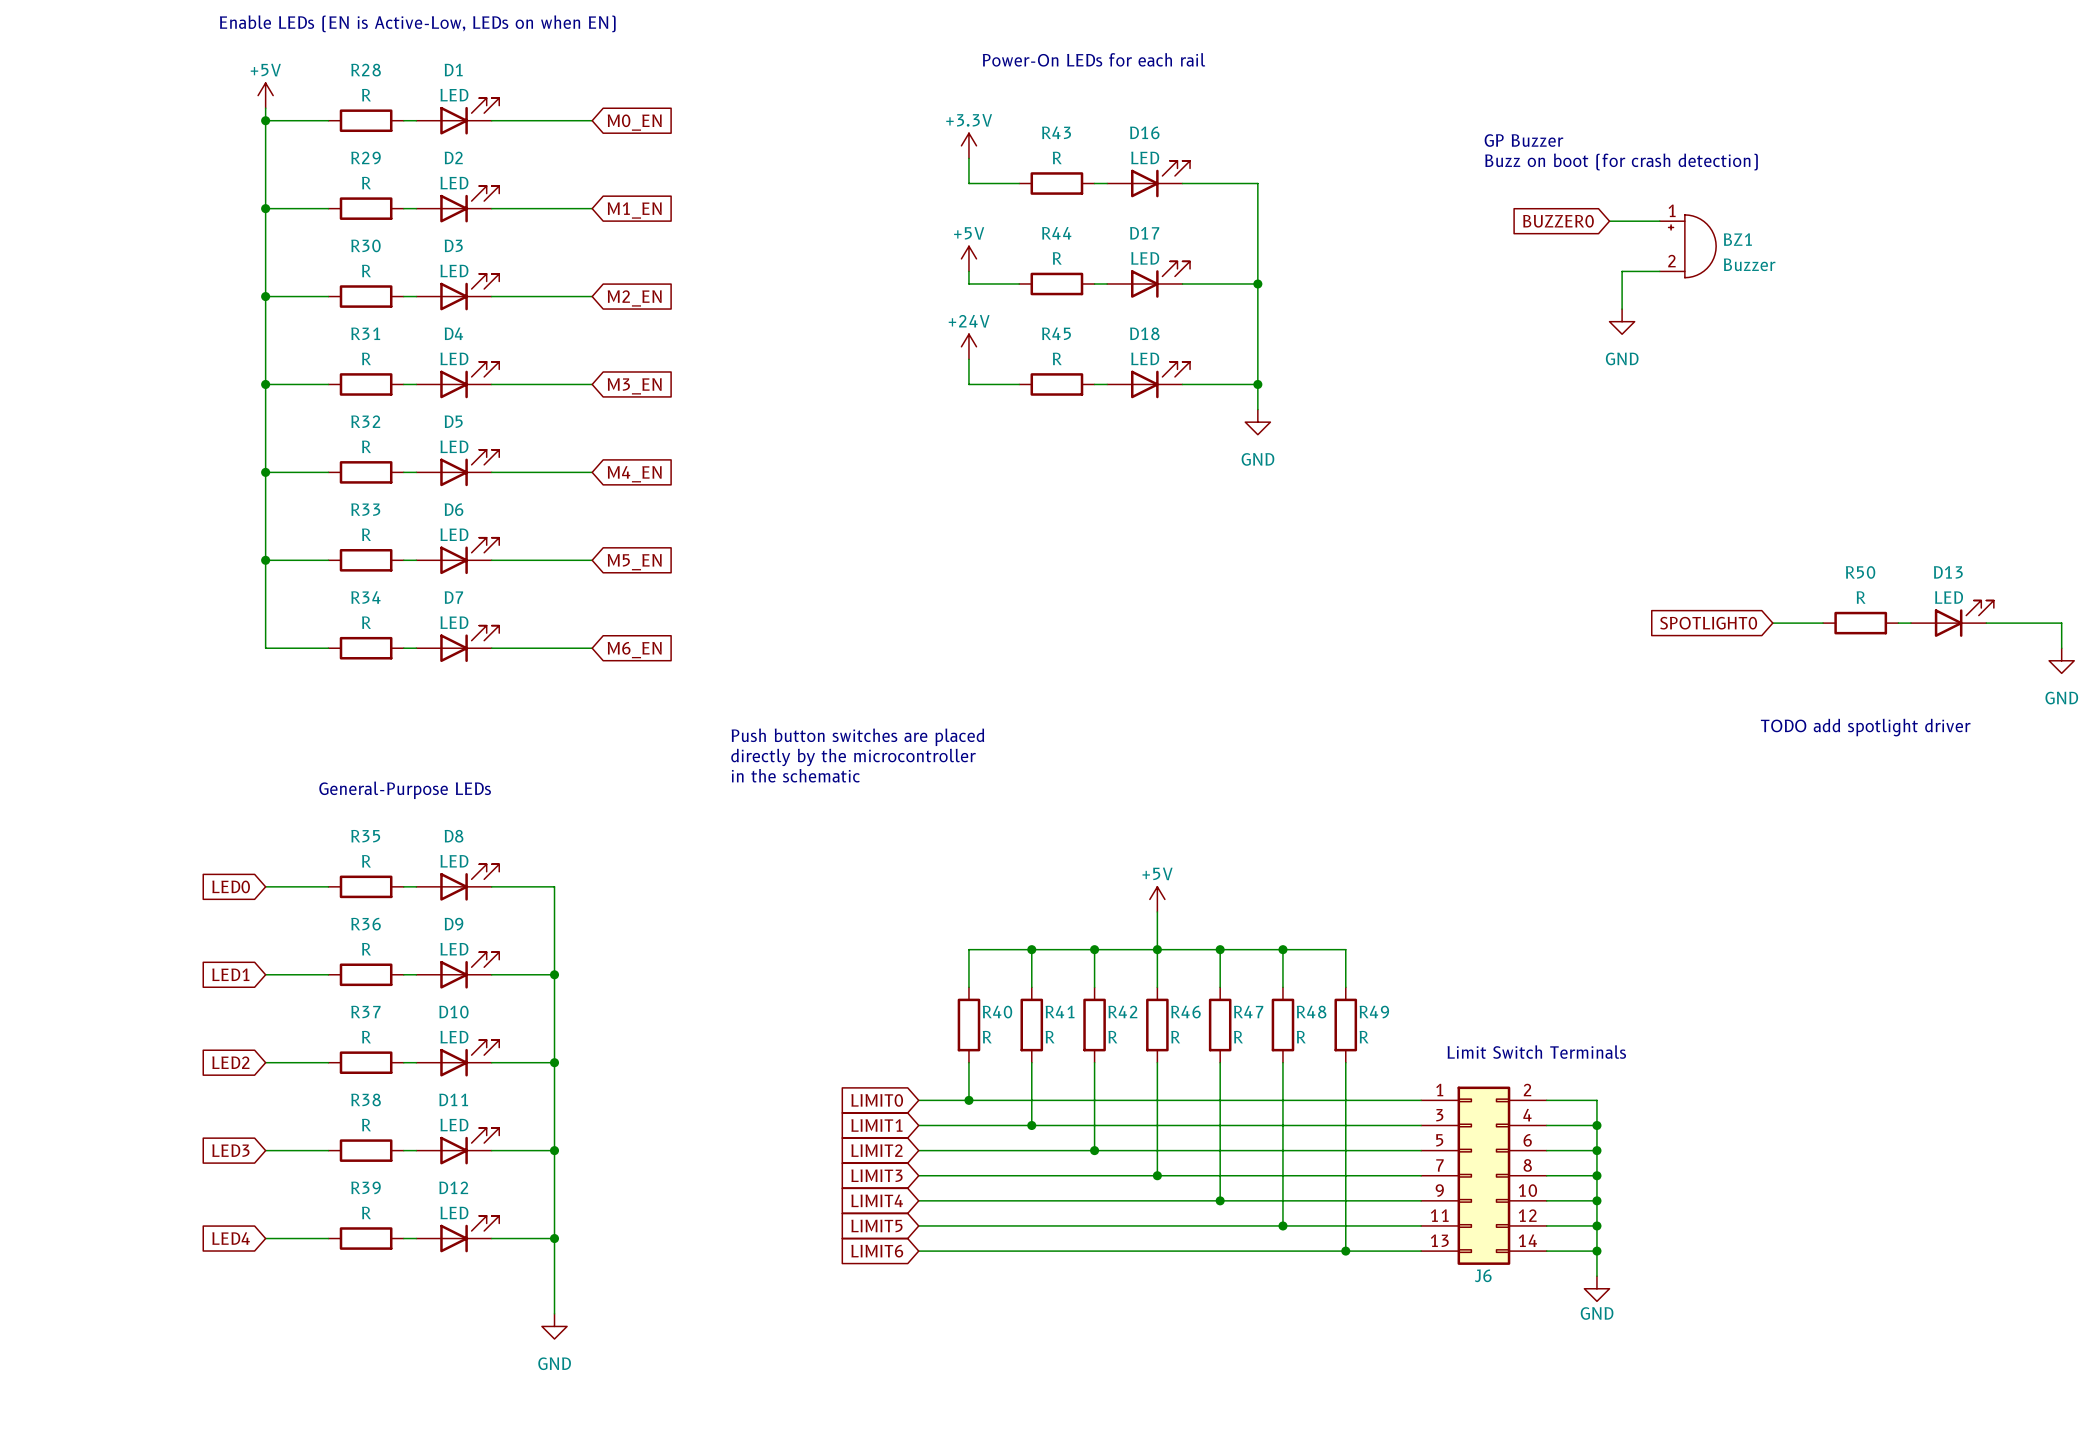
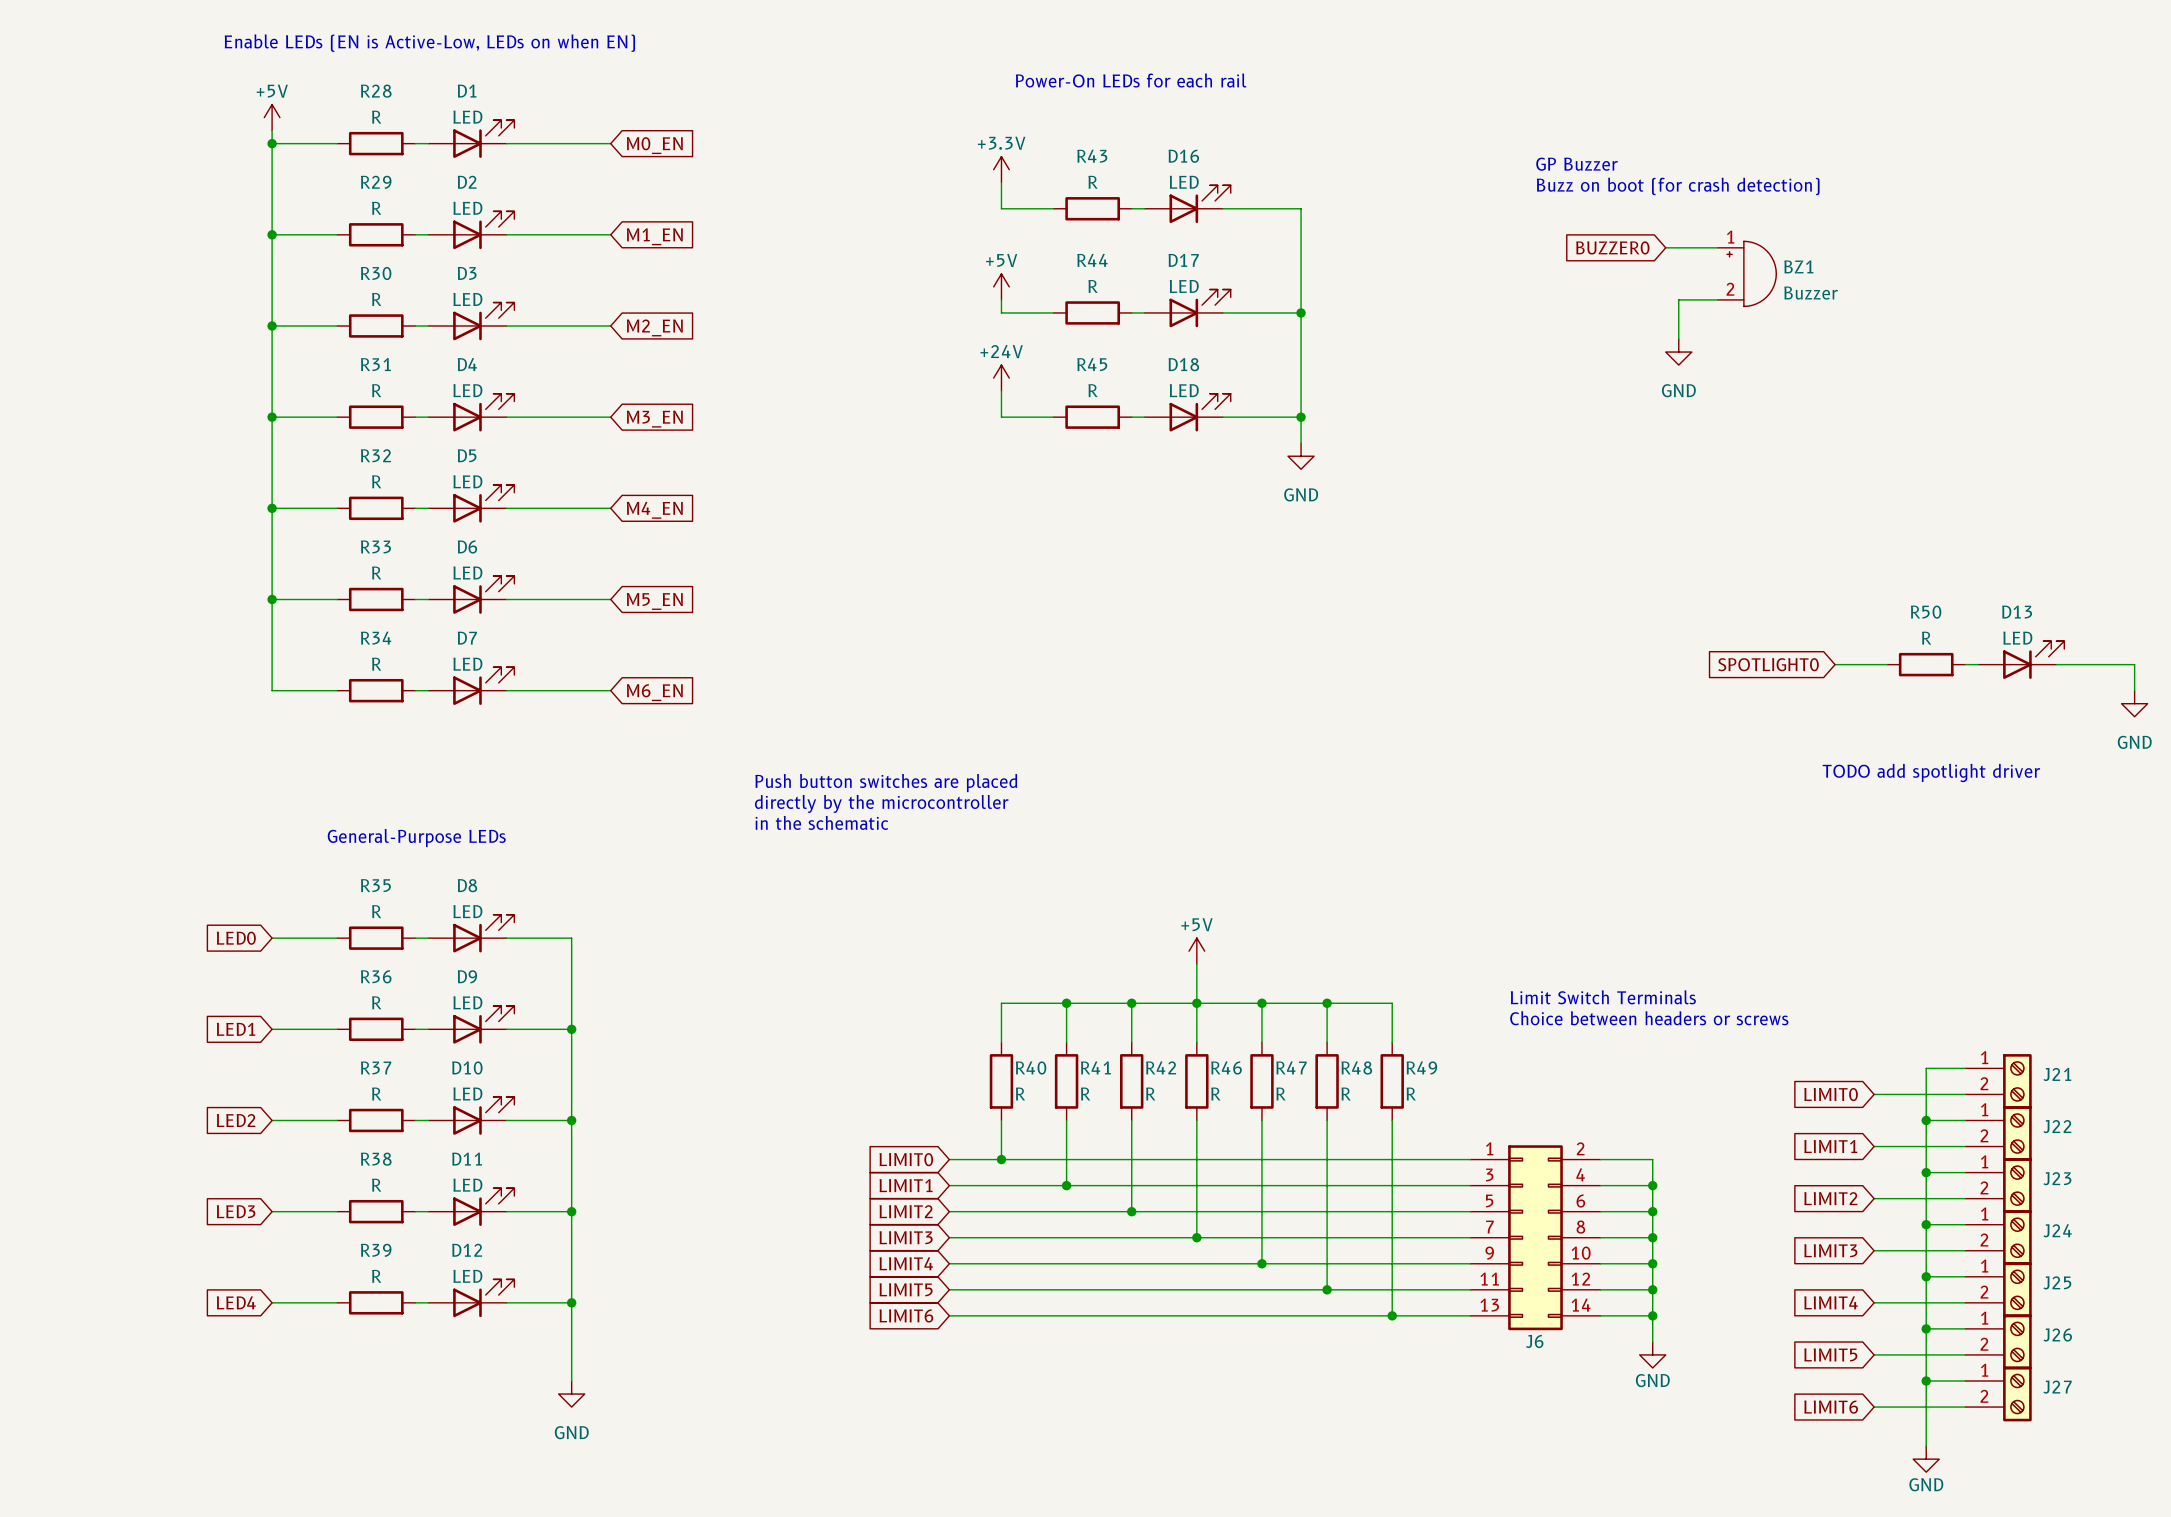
text: none -> Choice between headers or screws (1649, 1018)
wire: none -> (1965, 1068) (1926, 1068) (1926, 1446)
J21: none -> (1998, 1081)
global label: none -> LIMIT0 (1831, 1094)
wire: none -> (1874, 1094) (1965, 1094)
text position: Limit Switch Terminals (1536, 1052) -> Limit Switch Terminals (1603, 997)
wire: none -> (1926, 1120) (1965, 1120)
junction: none -> (1926, 1120)
J22: none -> (1998, 1133)
global label: none -> LIMIT1 (1830, 1146)
wire: none -> (1874, 1146) (1965, 1146)
wire: none -> (1926, 1172) (1965, 1172)
junction: none -> (1926, 1172)
J23: none -> (1998, 1185)
global label: none -> LIMIT2 (1830, 1198)
wire: none -> (1874, 1198) (1965, 1198)
wire: none -> (1926, 1224) (1965, 1224)
junction: none -> (1926, 1224)
J24: none -> (1998, 1237)
global label: none -> LIMIT3 (1830, 1250)
wire: none -> (1874, 1250) (1965, 1250)
wire: none -> (1926, 1276) (1965, 1276)
junction: none -> (1926, 1276)
J25: none -> (1998, 1289)
global label: none -> LIMIT4 (1831, 1302)
wire: none -> (1874, 1302) (1965, 1302)
wire: none -> (1926, 1328) (1965, 1328)
junction: none -> (1926, 1328)
J26: none -> (1998, 1341)
global label: none -> LIMIT5 (1830, 1354)
wire: none -> (1874, 1354) (1965, 1354)
wire: none -> (1926, 1380) (1965, 1380)
junction: none -> (1926, 1380)
J27: none -> (1998, 1394)
global label: none -> LIMIT6 (1831, 1407)
wire: none -> (1874, 1407) (1965, 1407)
power symbol: none -> GND (1926, 1459)

